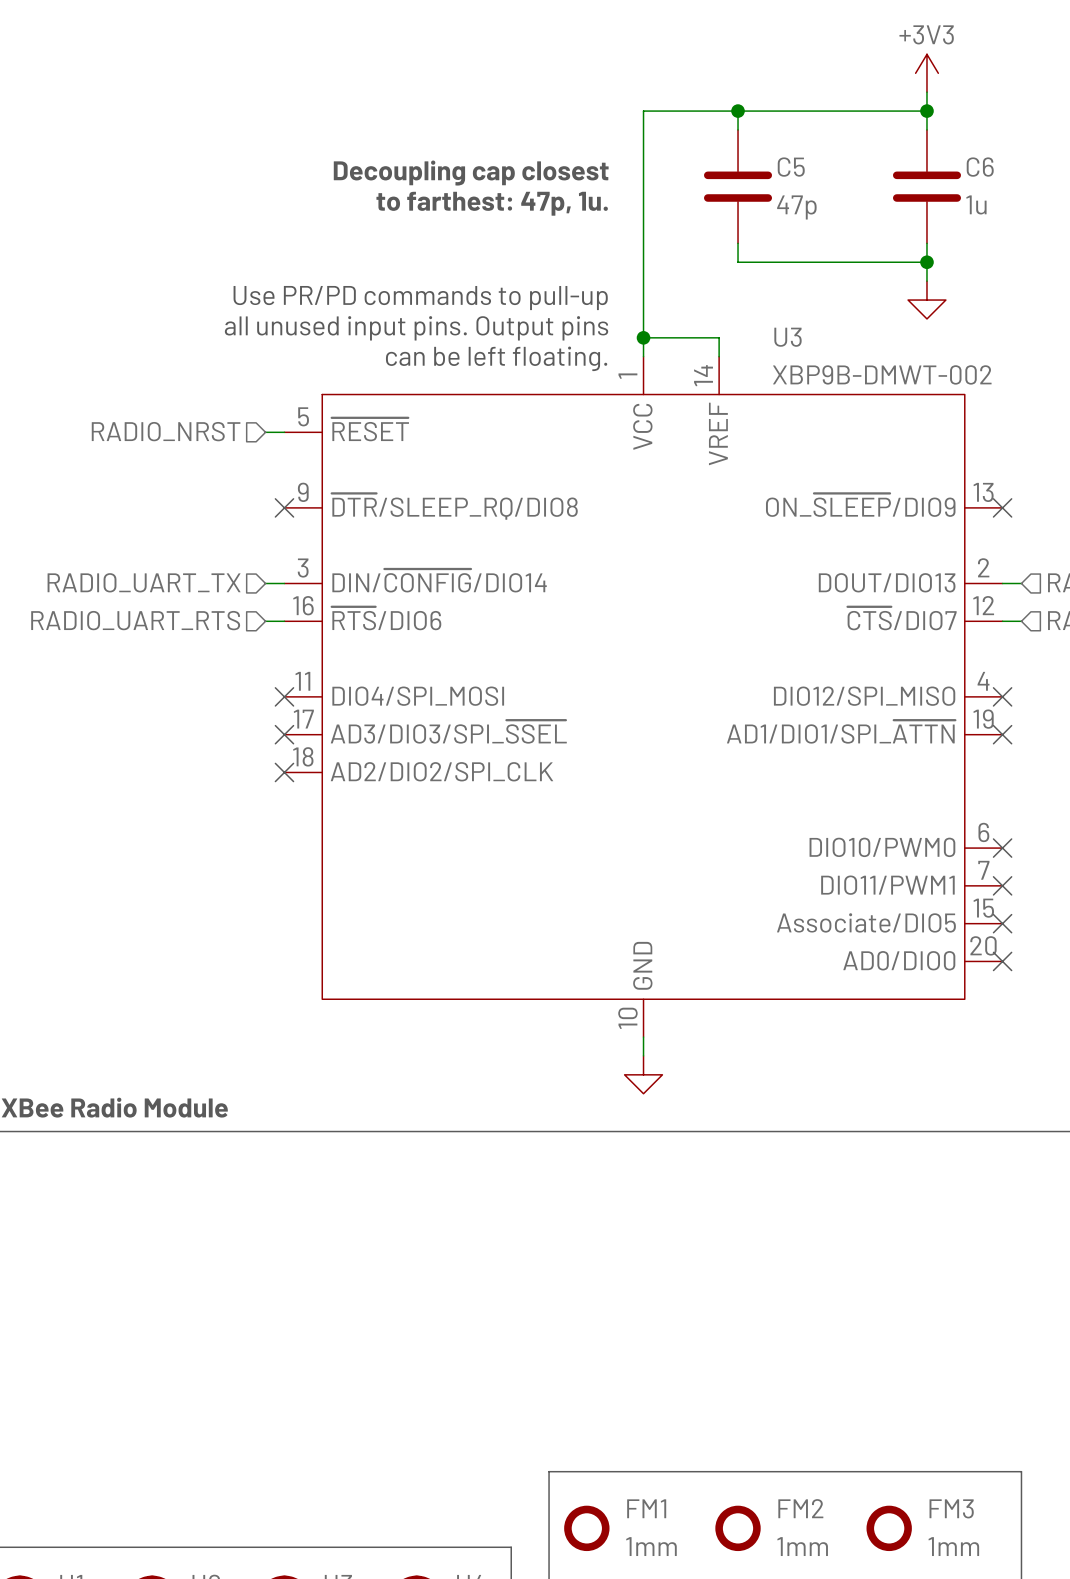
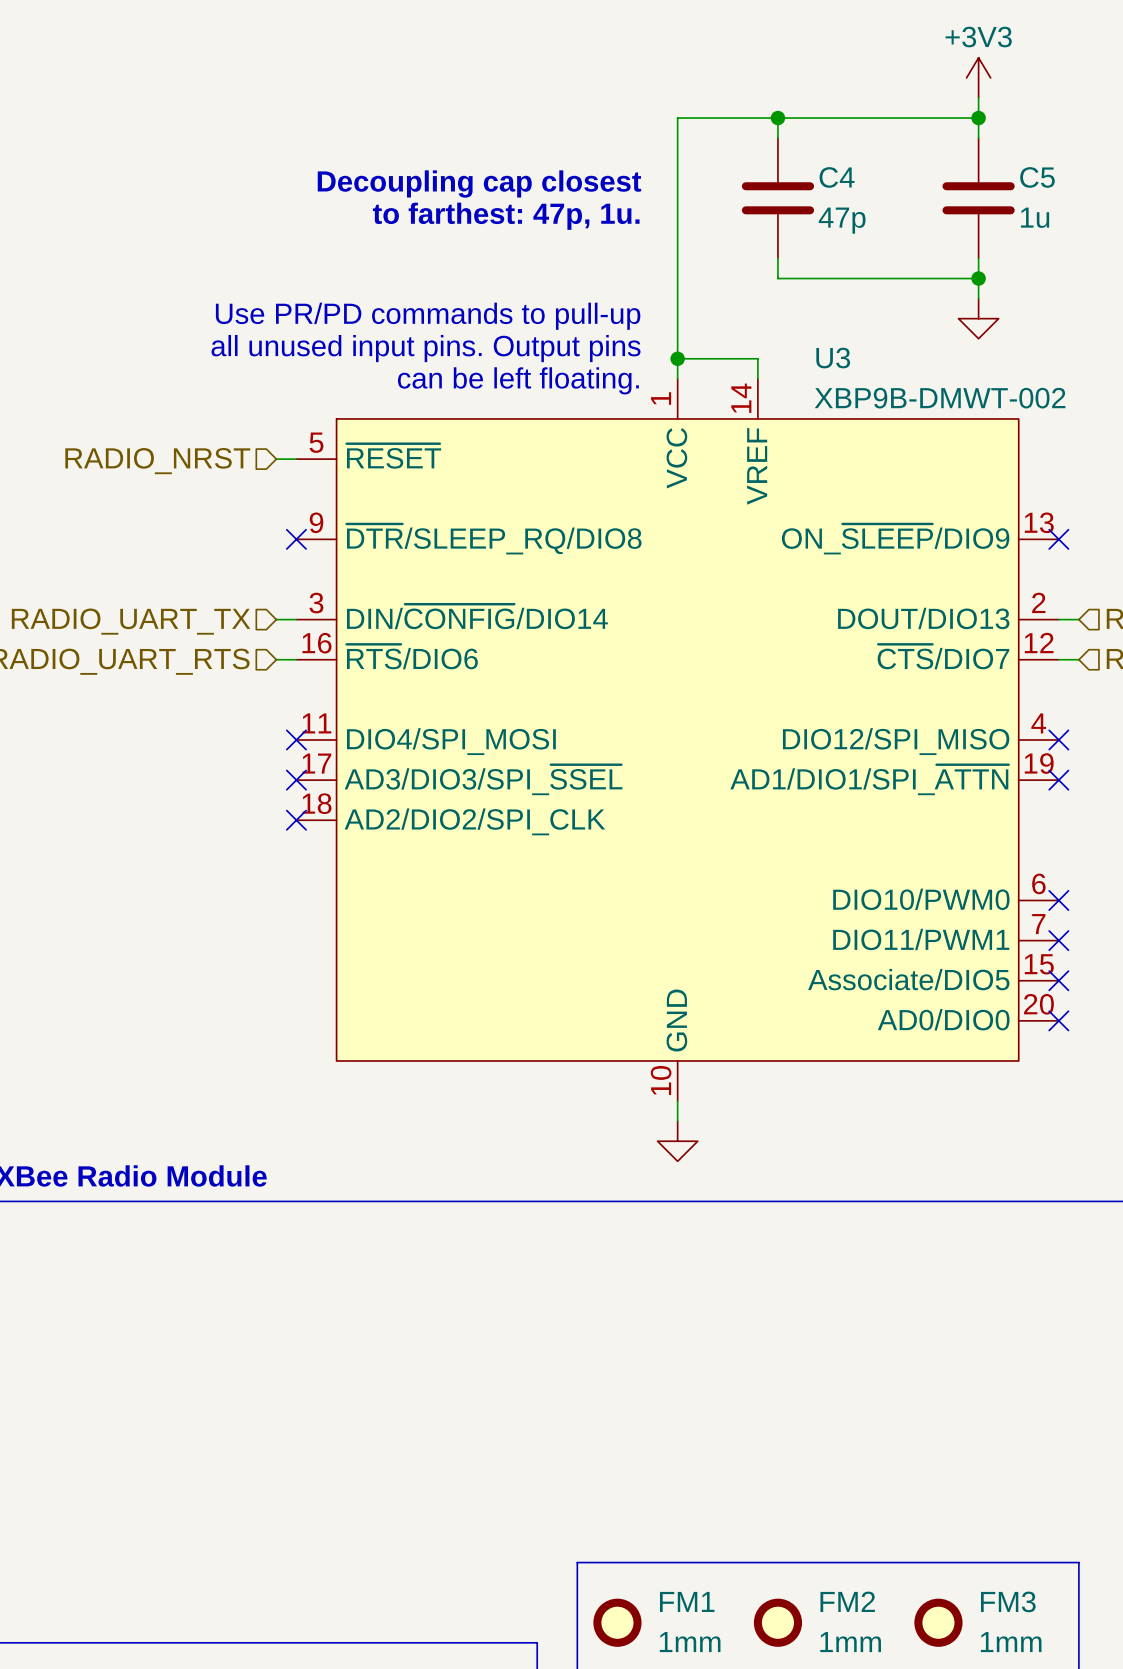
C5 name: C5 (791, 167) -> C4 (837, 177)
C6 name: C6 (980, 167) -> C5 (1037, 177)

